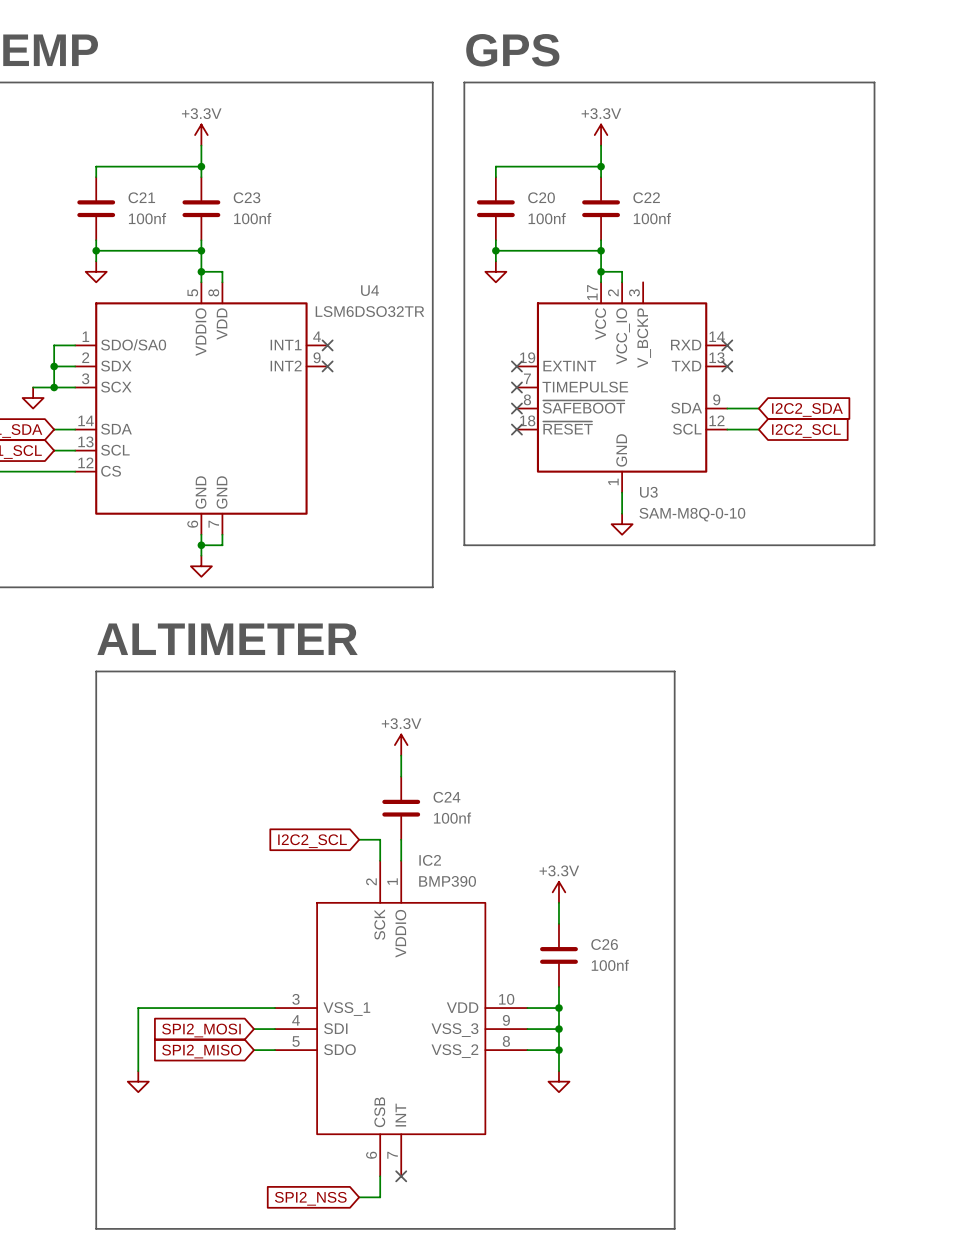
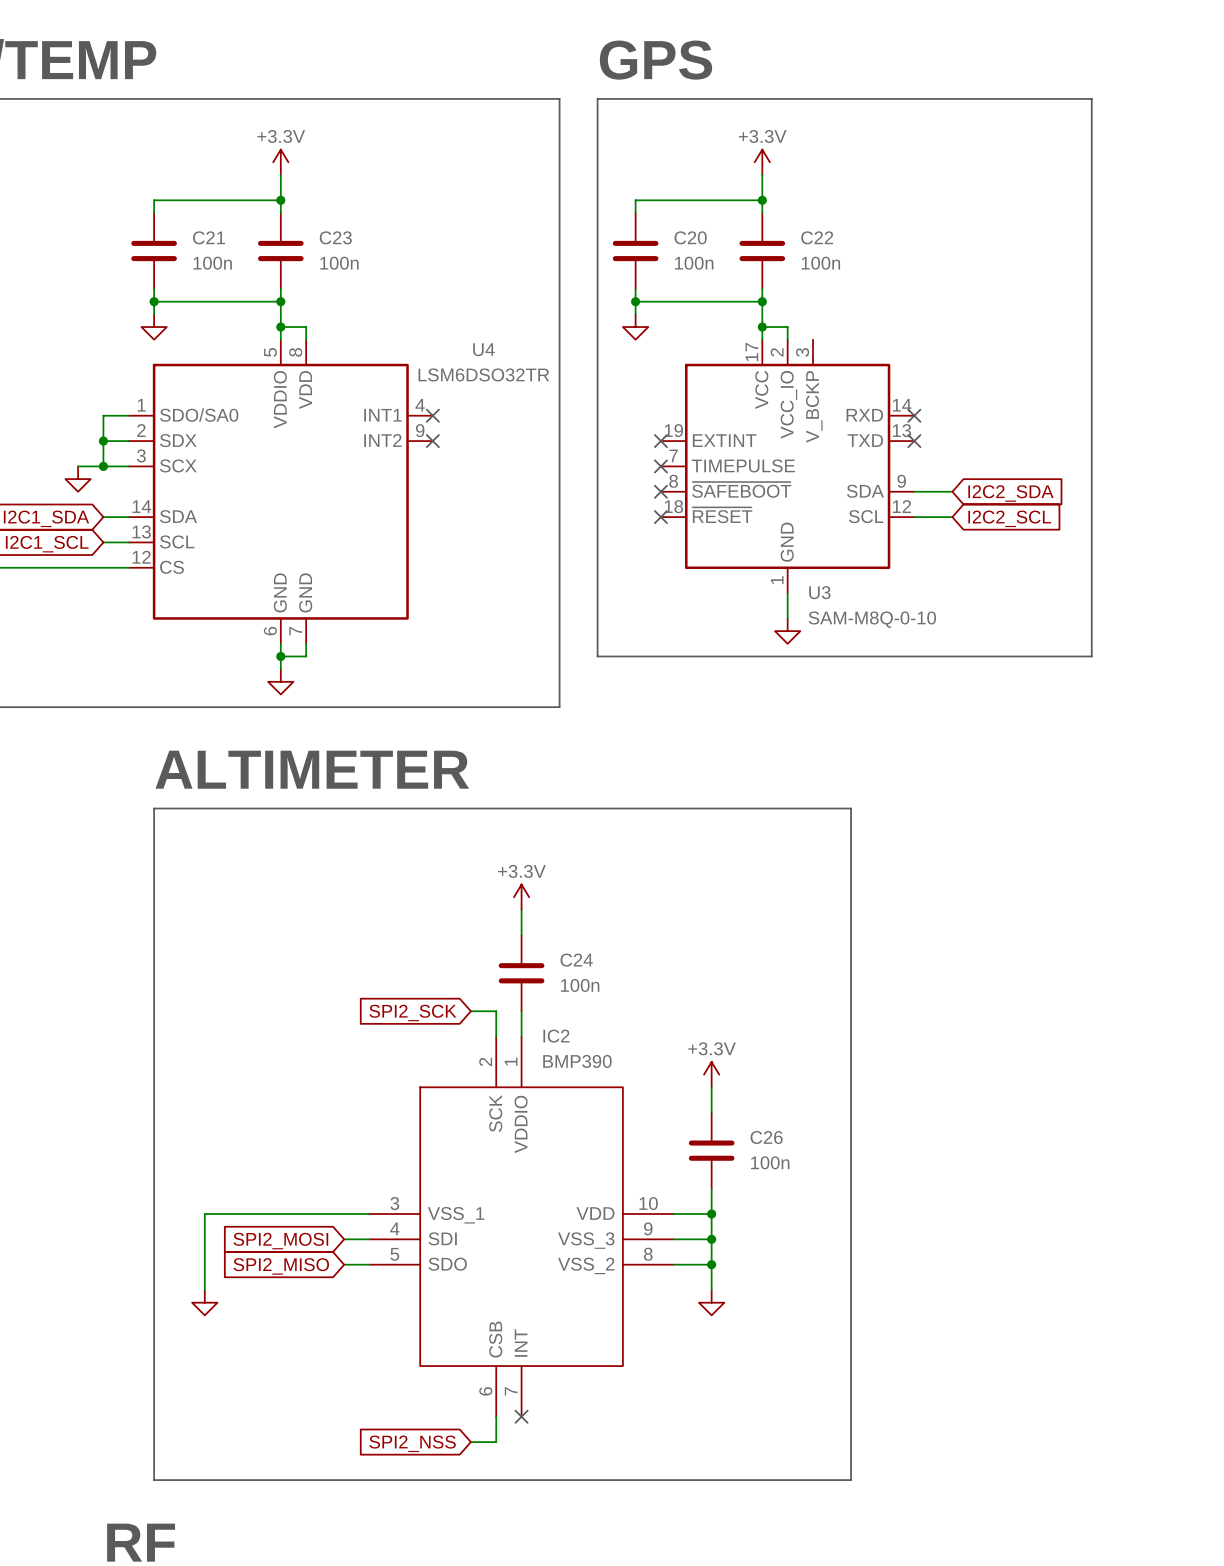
C21 value: 100nf (147, 218) -> 100n (212, 263)
C23 value: 100nf (252, 218) -> 100n (339, 263)
C20 value: 100nf (547, 218) -> 100n (694, 263)
C22 value: 100nf (652, 218) -> 100n (820, 263)
C24 value: 100nf (452, 818) -> 100n (580, 985)
global label: I2C2_SCL (312, 841) -> SPI2_SCK (412, 1013)
C26 value: 100nf (610, 965) -> 100n (770, 1162)

